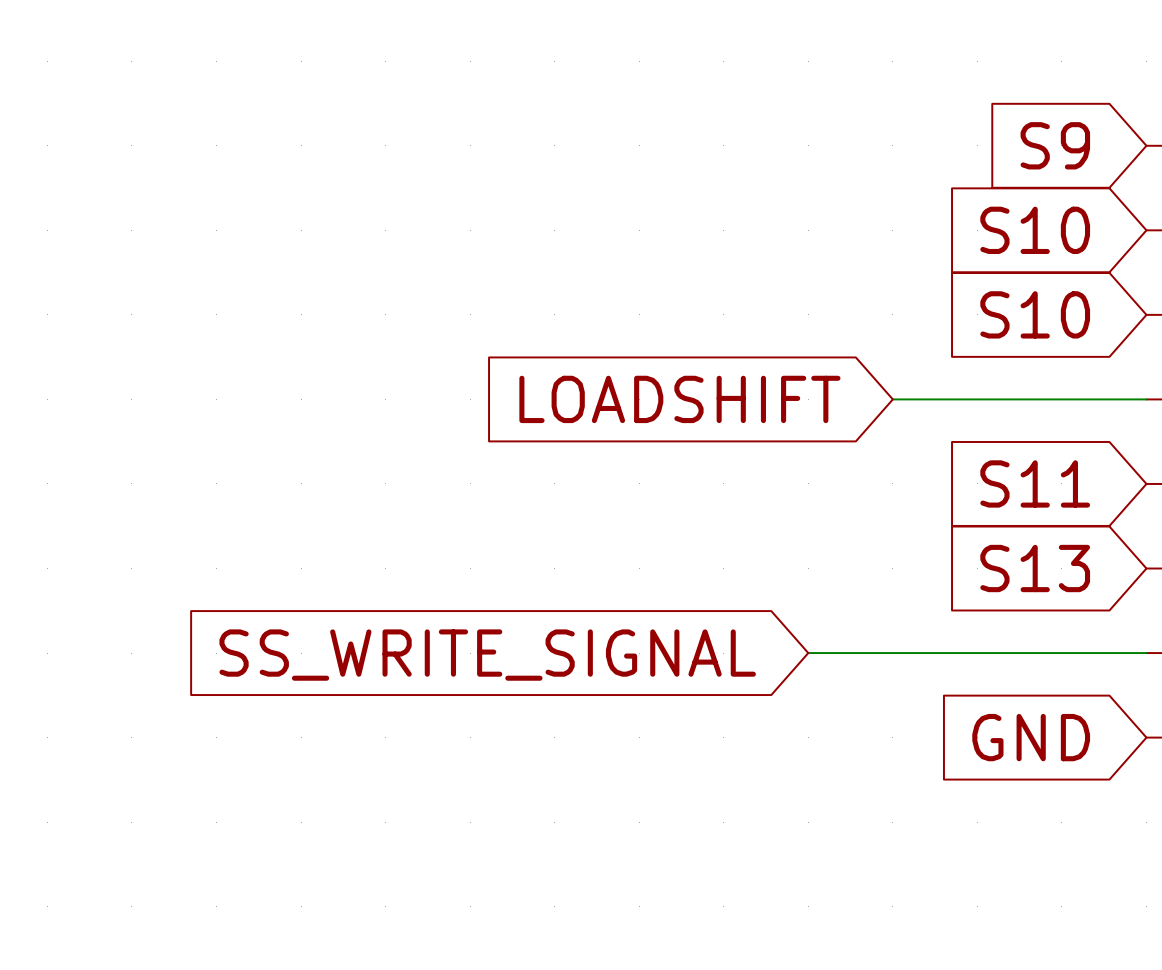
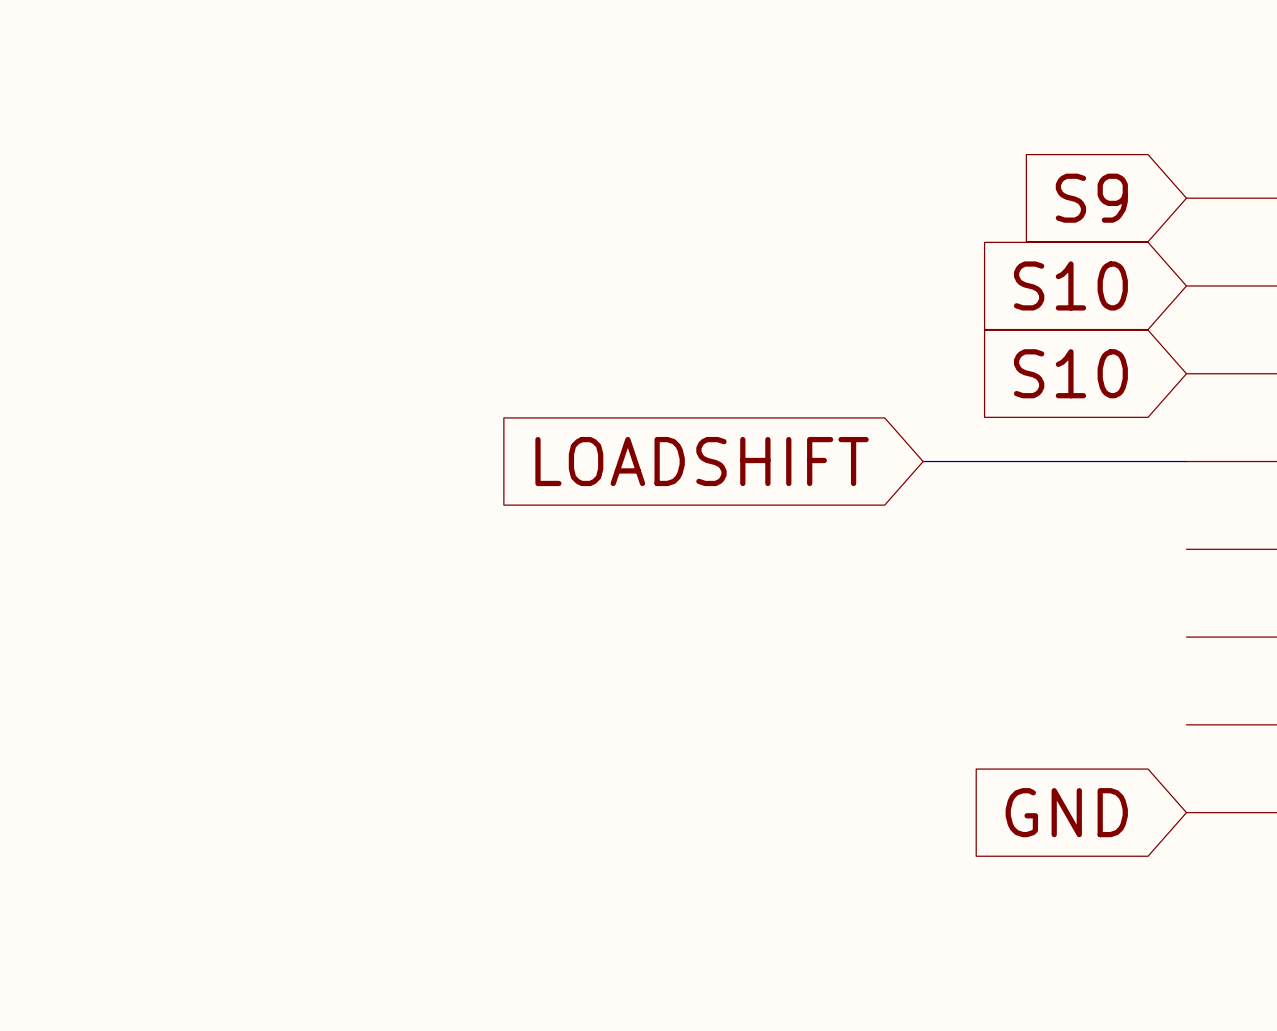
global label: S11 (1035, 483) -> none
global label: S13 (1035, 568) -> none
wire: (808, 653) (1146, 653) -> none
global label: SS_WRITE_SIGNAL (487, 655) -> none

